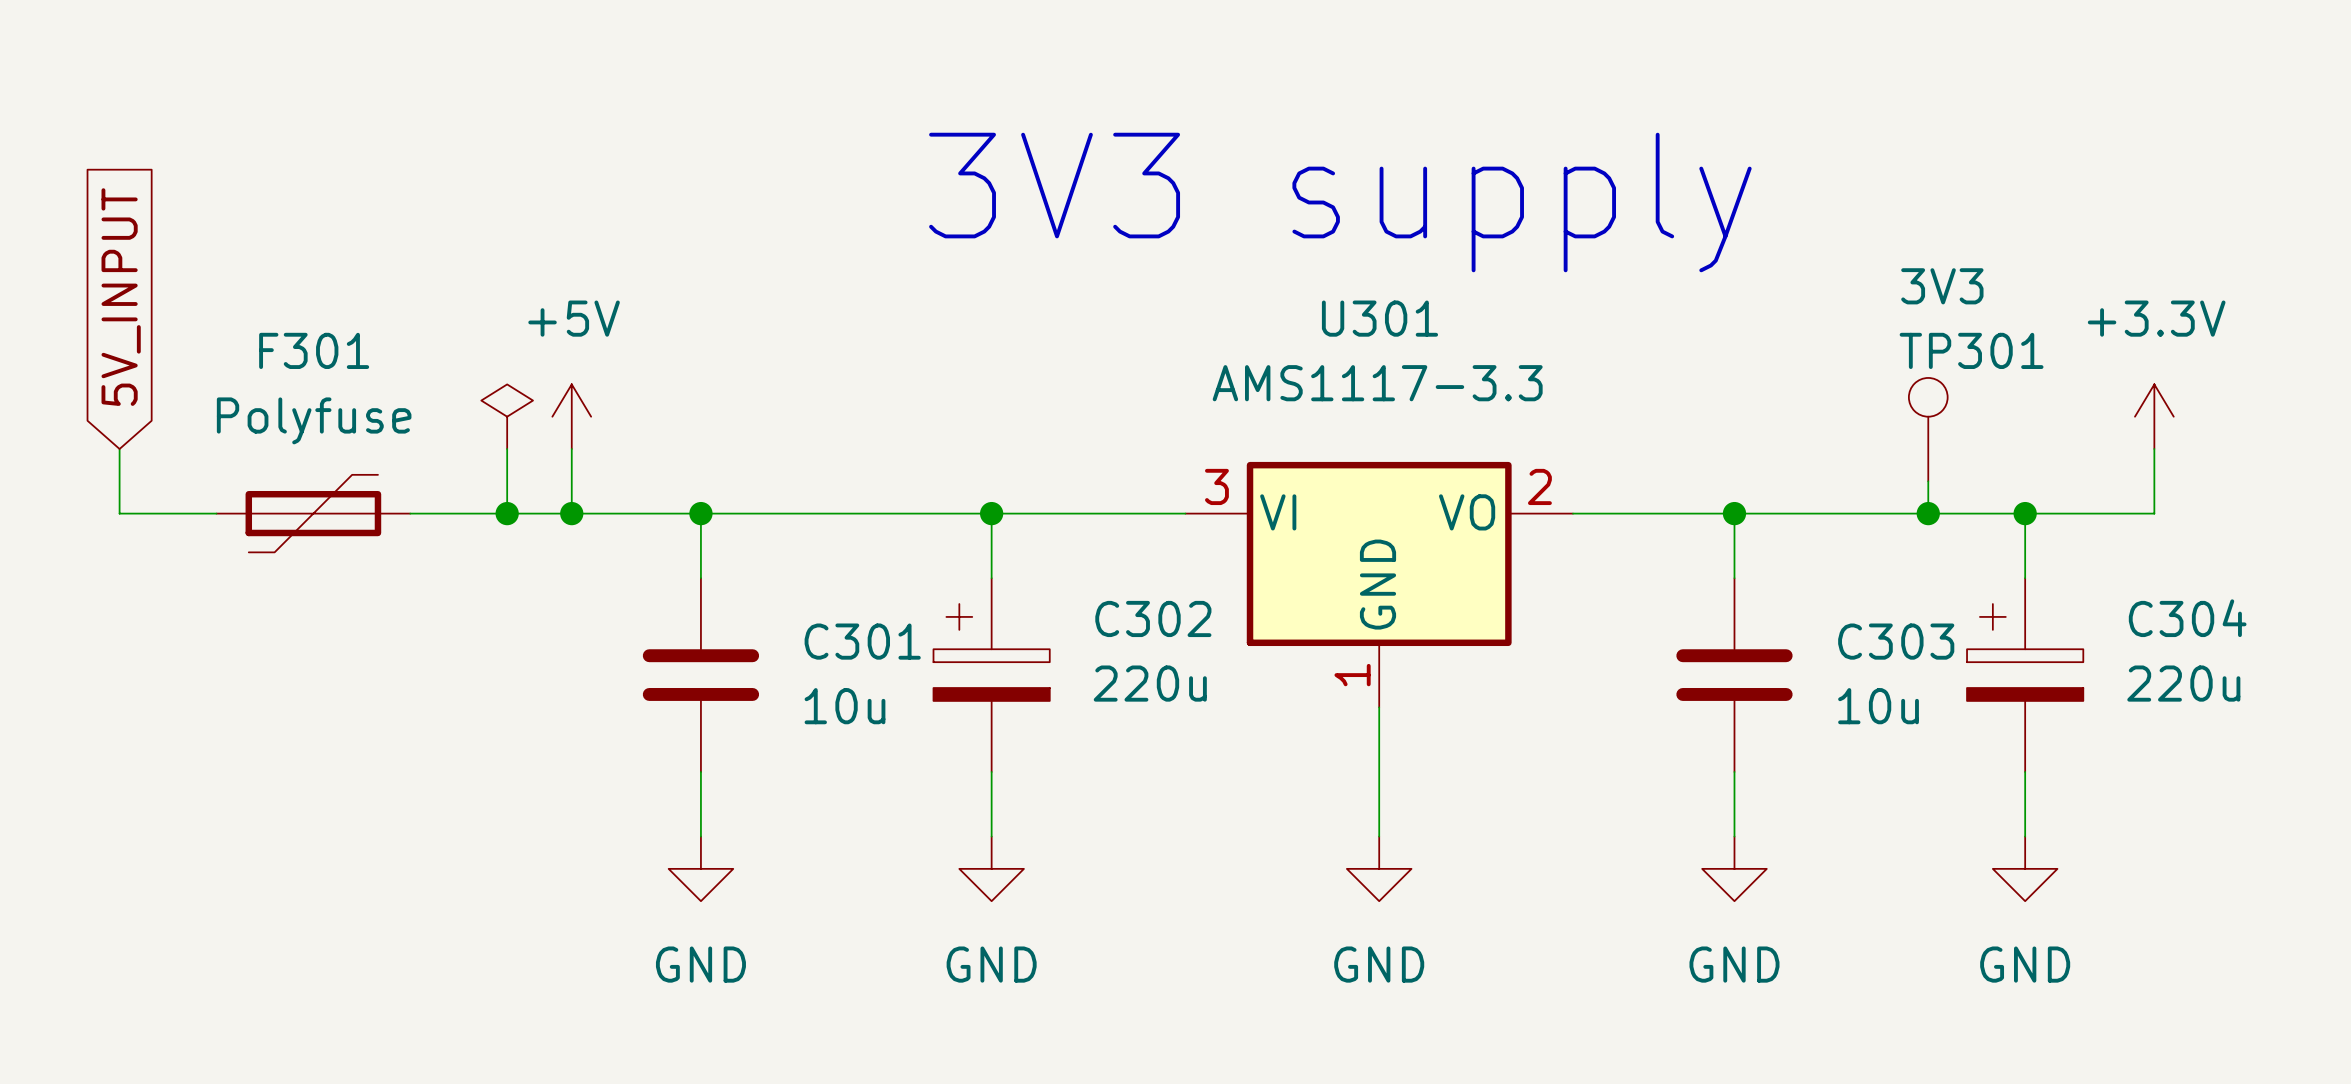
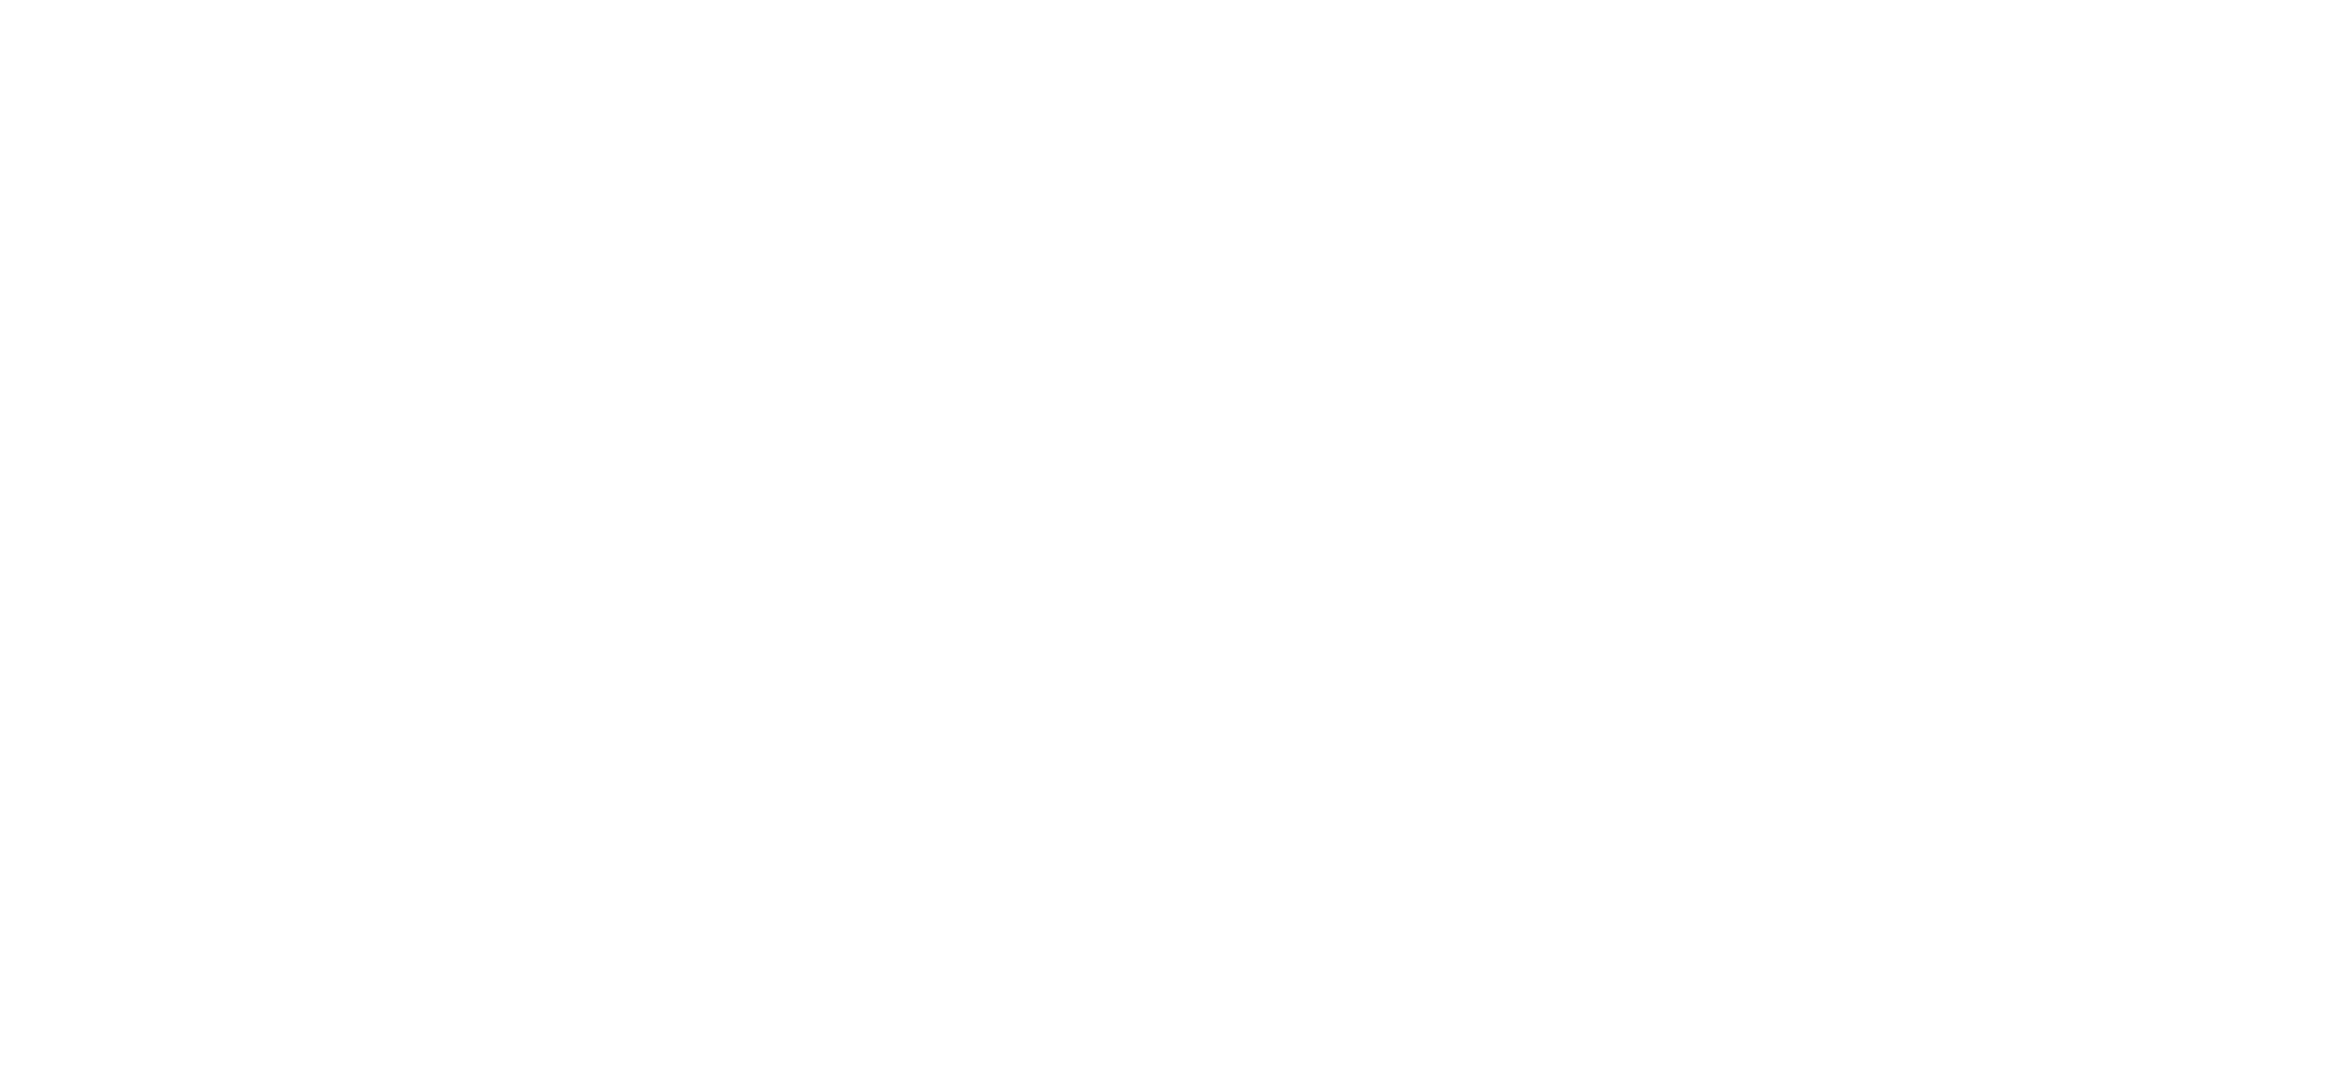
text: 3V3 supply (1340, 202) -> none
global label: 5V_INPUT (121, 297) -> none
power symbol: (507, 416) -> none
power symbol: +5V (571, 416) -> none
power symbol: +3.3V (2154, 416) -> none
TP301: 3V3 (1928, 429) -> none
wire: (119, 449) (119, 513) (216, 513) -> none
wire: (507, 449) (507, 513) -> none
wire: (571, 449) (571, 513) -> none
wire: (2154, 449) (2154, 513) (1572, 513) -> none
wire: (1928, 481) (1928, 513) -> none
F301: Polyfuse (313, 513) -> none
wire: (410, 513) (1185, 513) -> none
junction: (507, 513) -> none
junction: (571, 513) -> none
wire: (700, 513) (700, 578) -> none
junction: (700, 513) -> none
wire: (991, 513) (991, 578) -> none
junction: (991, 513) -> none
wire: (1734, 513) (1734, 578) -> none
junction: (1734, 513) -> none
junction: (1928, 513) -> none
wire: (2025, 513) (2025, 578) -> none
junction: (2025, 513) -> none
U301: AMS1117-3.3 (1379, 584) -> none
C301: 10u (700, 675) -> none
C302: 220u (991, 675) -> none
C303: 10u (1734, 675) -> none
C304: 220u (2025, 675) -> none
wire: (1379, 707) (1379, 836) -> none
wire: (700, 771) (700, 836) -> none
wire: (991, 771) (991, 836) -> none
wire: (1734, 771) (1734, 836) -> none
wire: (2025, 771) (2025, 836) -> none
power symbol: GND (700, 868) -> none
power symbol: GND (991, 868) -> none
power symbol: GND (1379, 868) -> none
power symbol: GND (1734, 868) -> none
power symbol: GND (2025, 868) -> none

